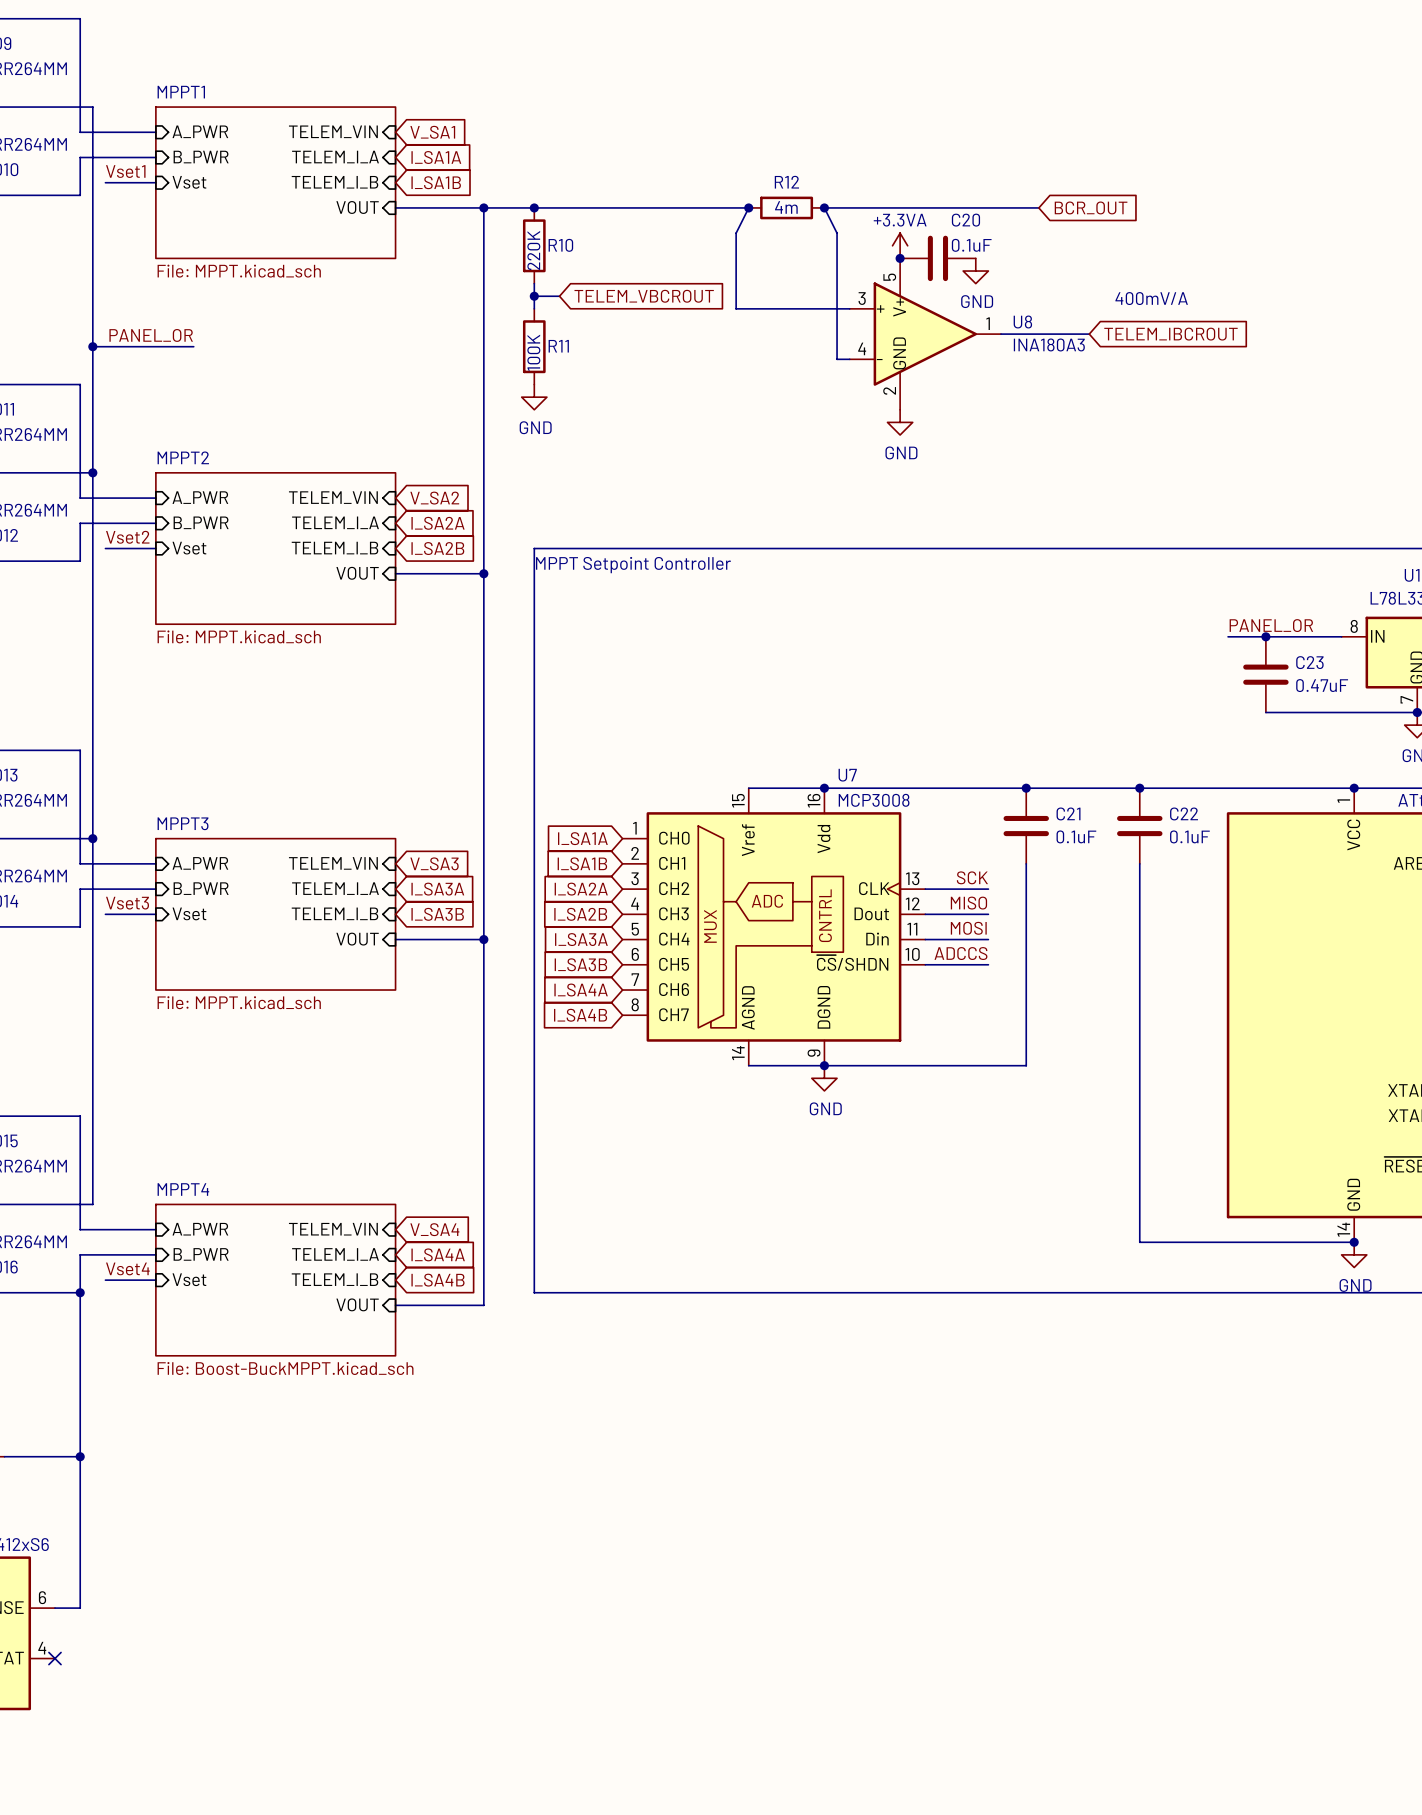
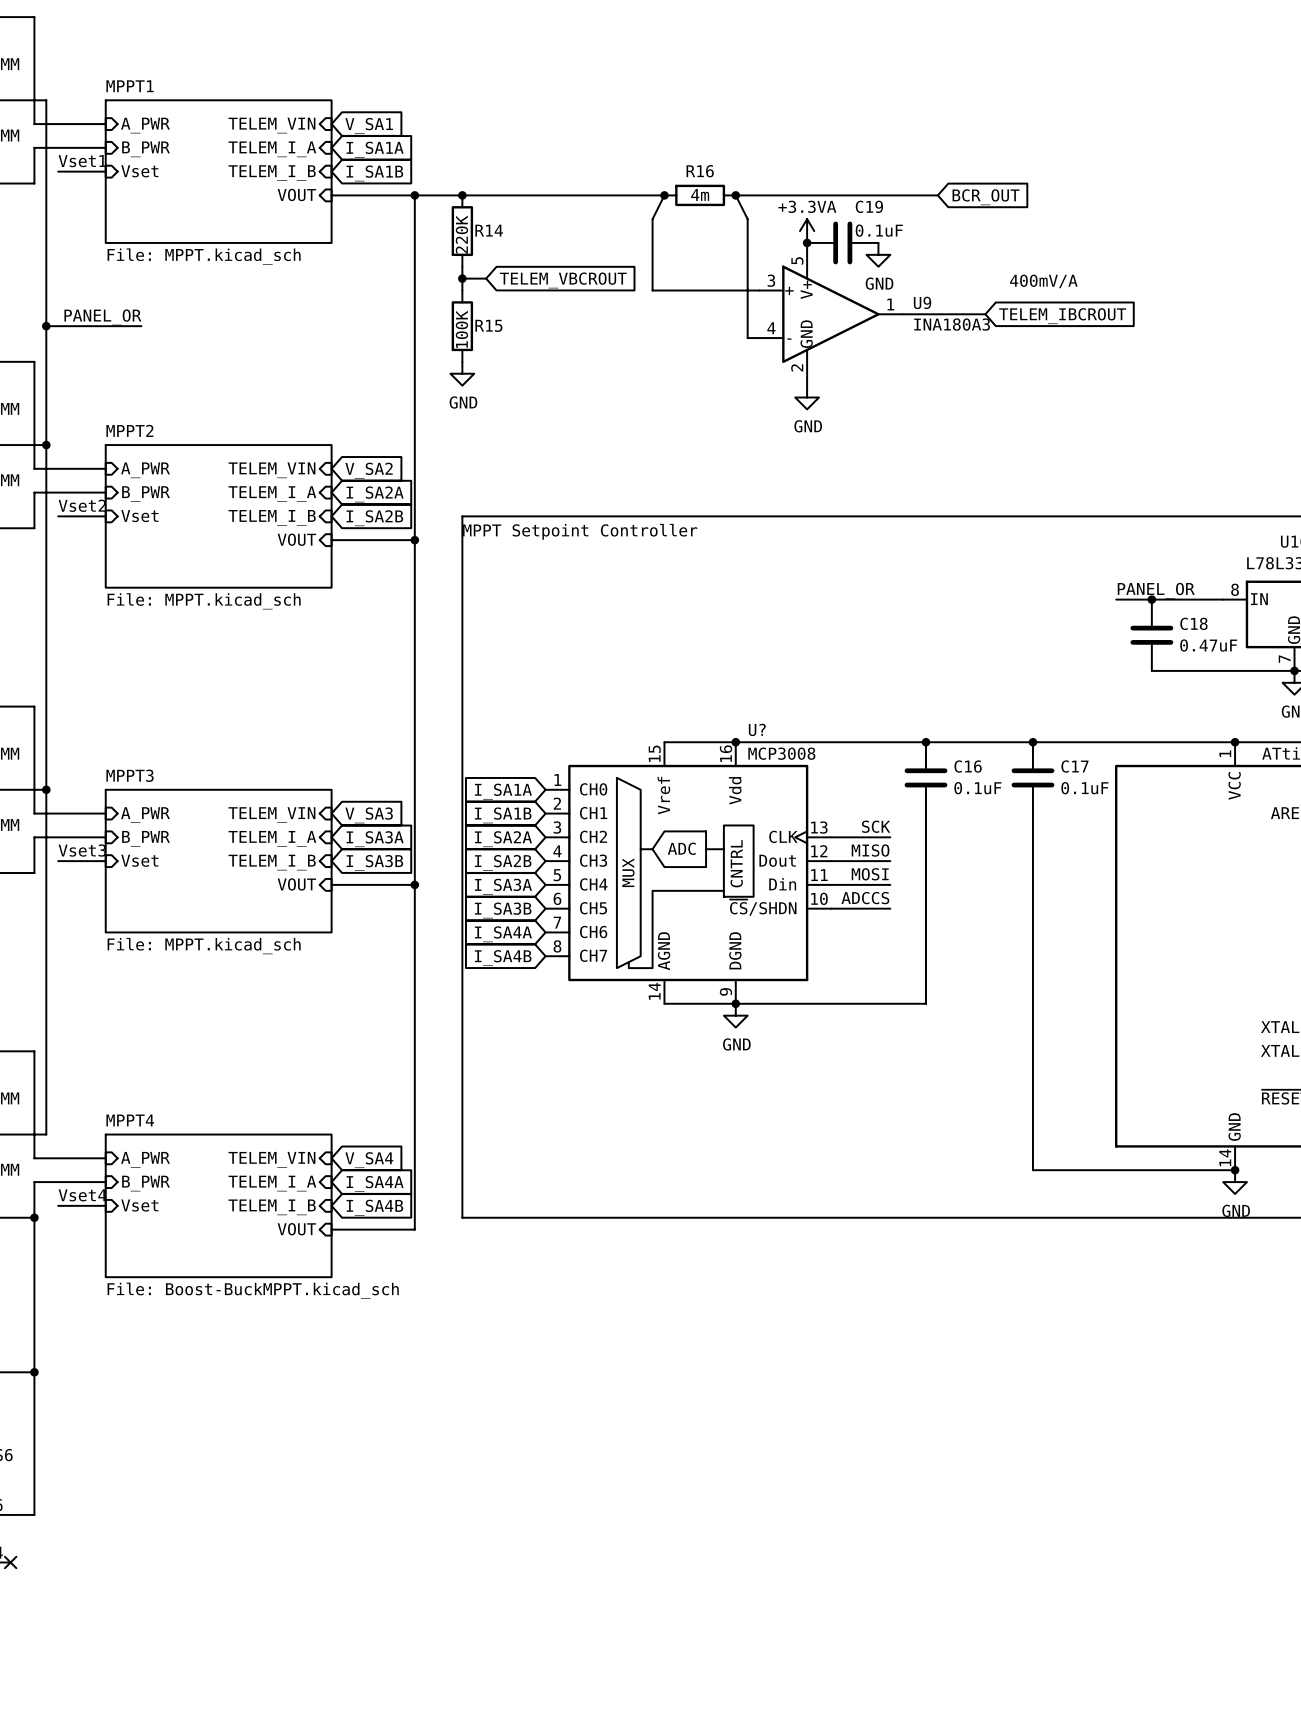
R12 name: R12 (786, 182) -> R16 (700, 171)
C20 name: C20 (965, 220) -> C19 (869, 206)
R10 name: R10 (560, 245) -> R14 (489, 230)
U8 name: U8 (1022, 322) -> U9 (922, 302)
R11 name: R11 (558, 346) -> R15 (488, 325)
C23 name: C23 (1309, 662) -> C18 (1193, 623)
U7 name: U7 (847, 775) -> U? (757, 729)
C21 name: C21 (1068, 813) -> C16 (968, 766)
C22 name: C22 (1184, 813) -> C17 (1074, 766)

